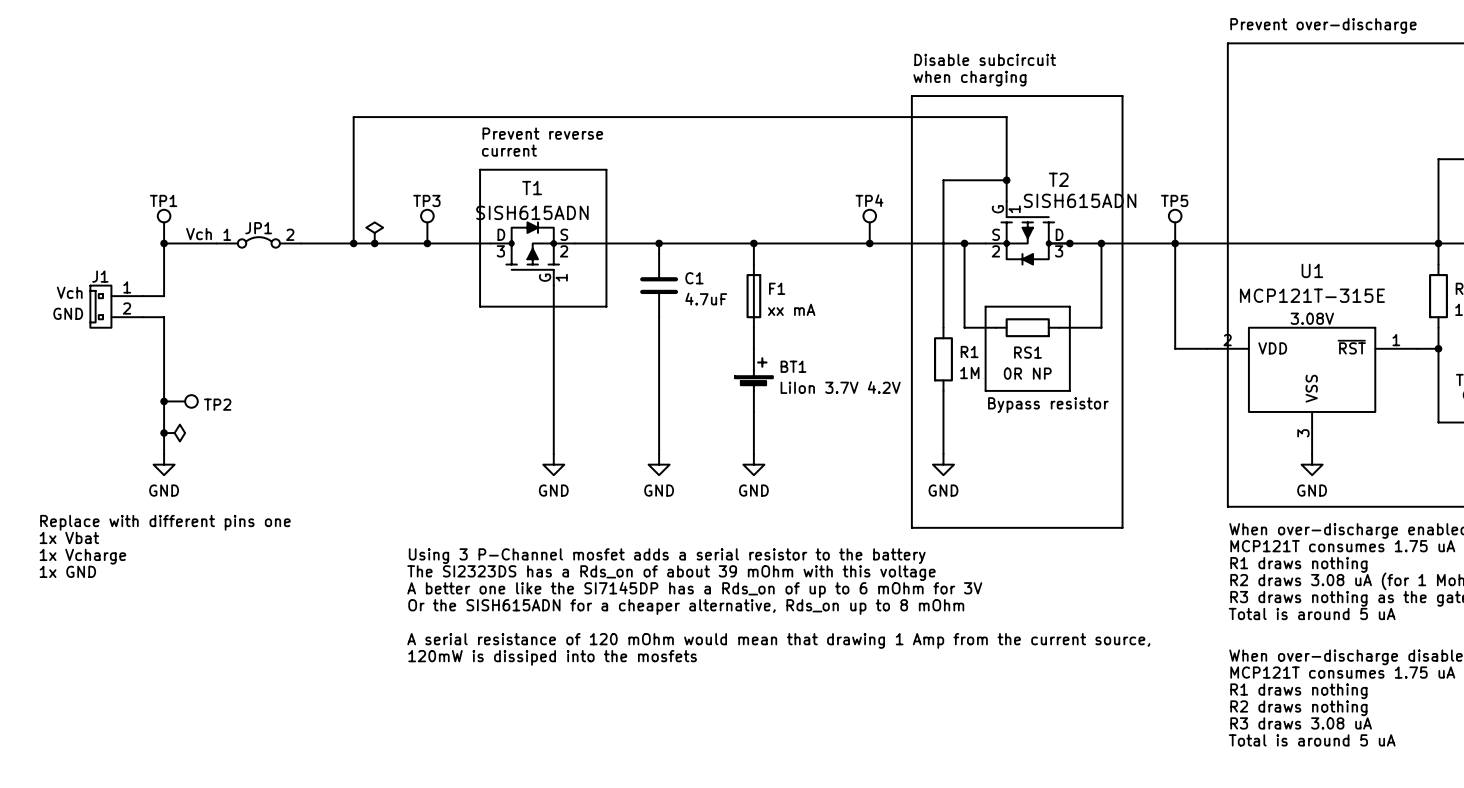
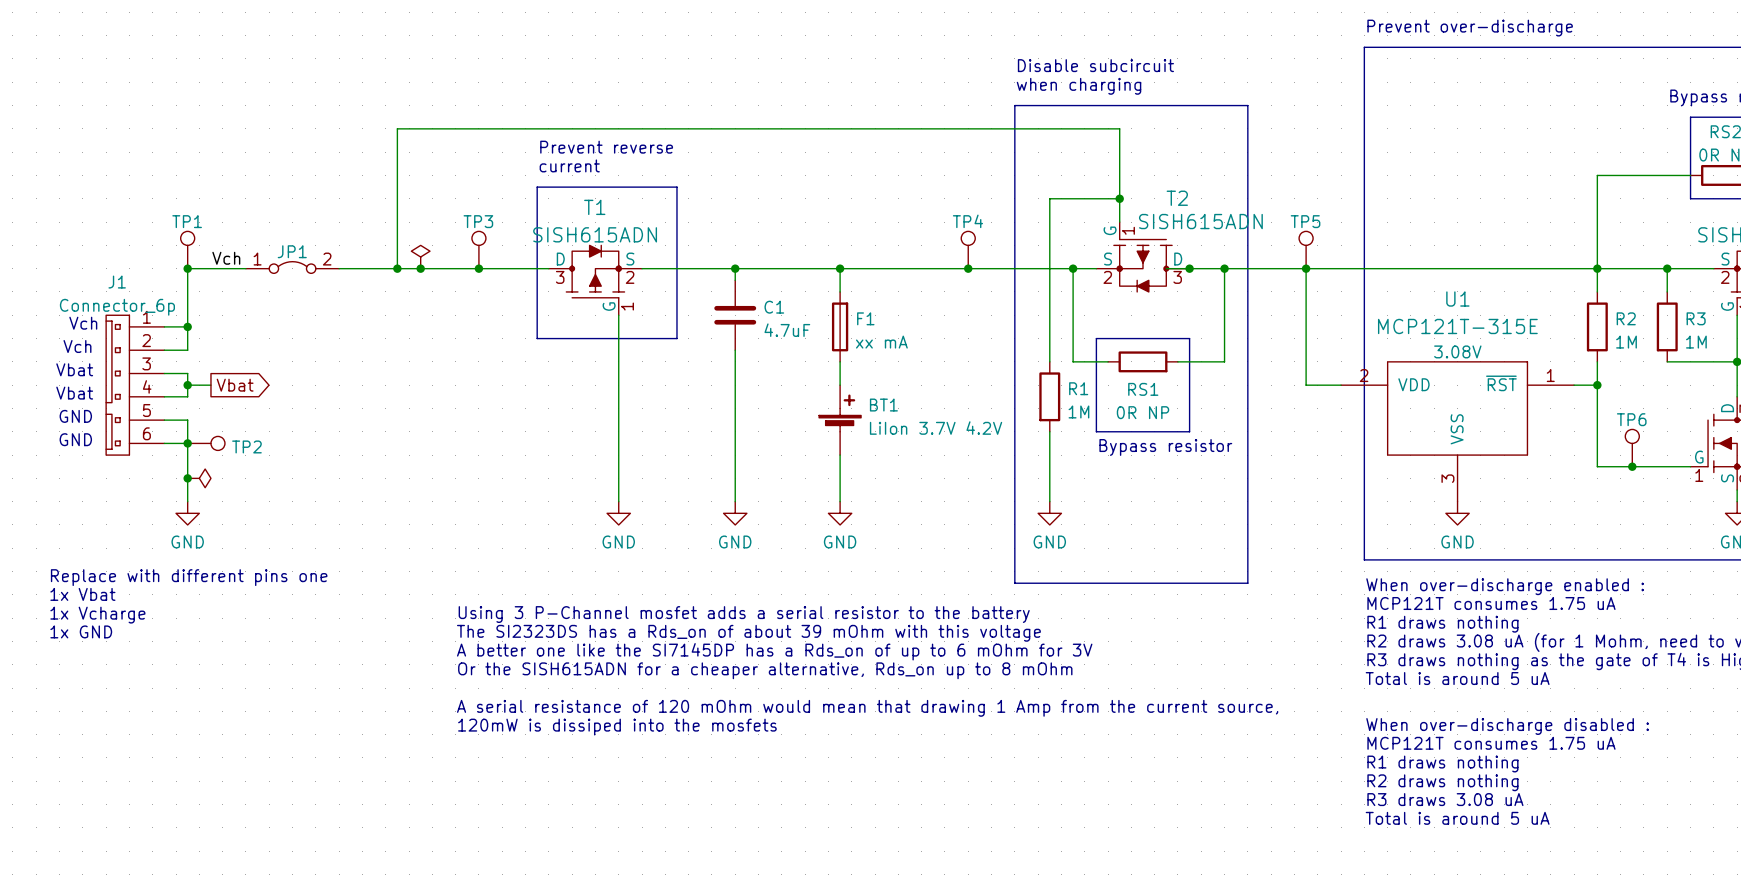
J1 name position: J1 (100, 276) -> J1 (117, 282)
J1 value: none -> Connector_6p (117, 307)
J1 symbol: [89, 285, 144, 328] -> [105, 315, 165, 456]
wire: none -> (187, 326) (187, 350)
junction: none -> (187, 326)
text: GND (68, 313) -> Vch (77, 346)
wire: (164, 317) (164, 338) -> (164, 373) (187, 373)
text: none -> Vbat (74, 369)
wire: none -> (187, 385) (210, 385)
junction: none -> (187, 385)
global label: none -> Vbat (235, 385)
text: none -> Vbat (74, 393)
wire: (164, 359) (164, 380) -> (187, 396) (164, 396)
text: none -> GND (75, 416)
wire: none -> (164, 420) (187, 420)
text: none -> GND (75, 439)
wire: none -> (164, 443) (187, 443)

